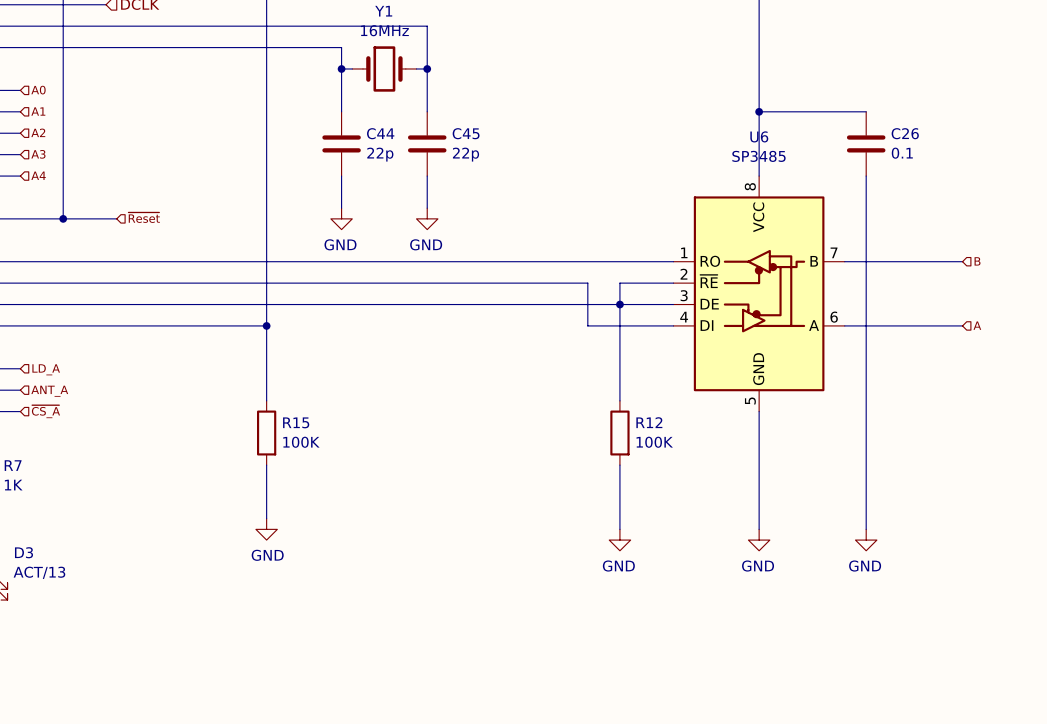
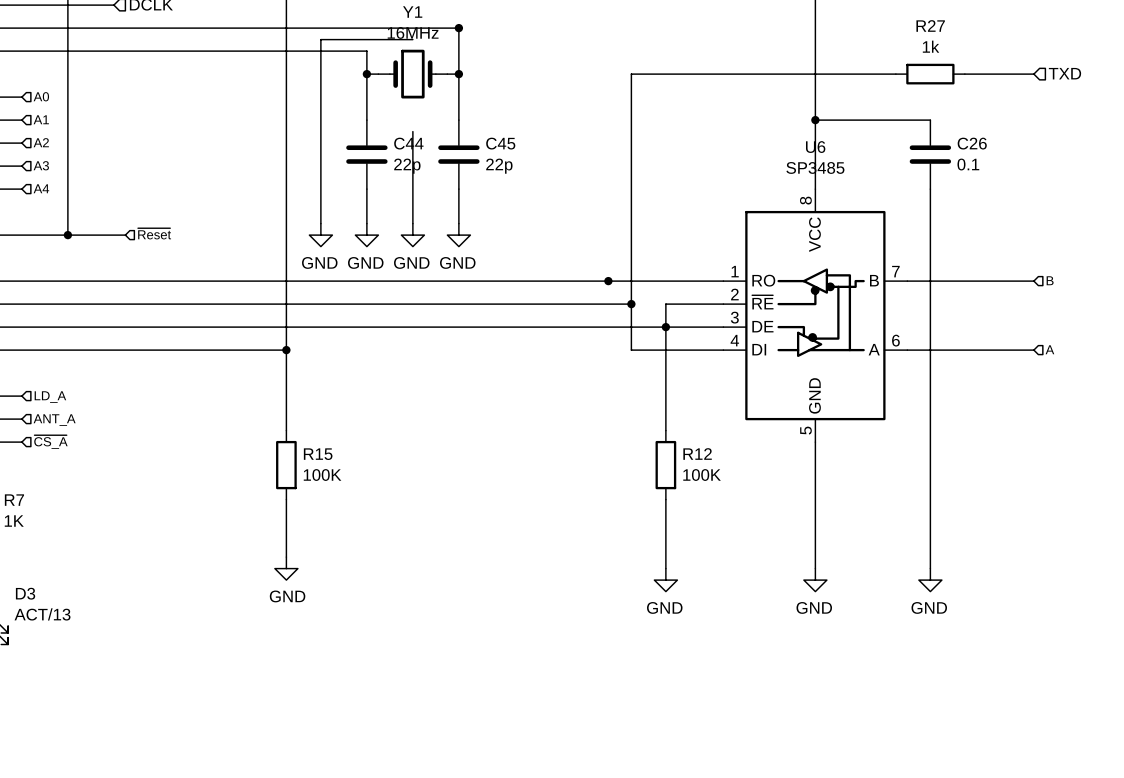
junction: none -> (458, 28)
wire: none -> (412, 39) (320, 39) (320, 223)
wire: none -> (895, 74) (631, 74) (631, 304)
R27: none -> 1k (930, 74)
wire: none -> (964, 74) (1033, 74)
hierarchical label: none -> TXD (1064, 73)
wire: none -> (412, 131) (412, 223)
power symbol: none -> GND (320, 235)
power symbol: none -> GND (412, 235)
junction: none -> (608, 281)
junction: none -> (631, 304)

